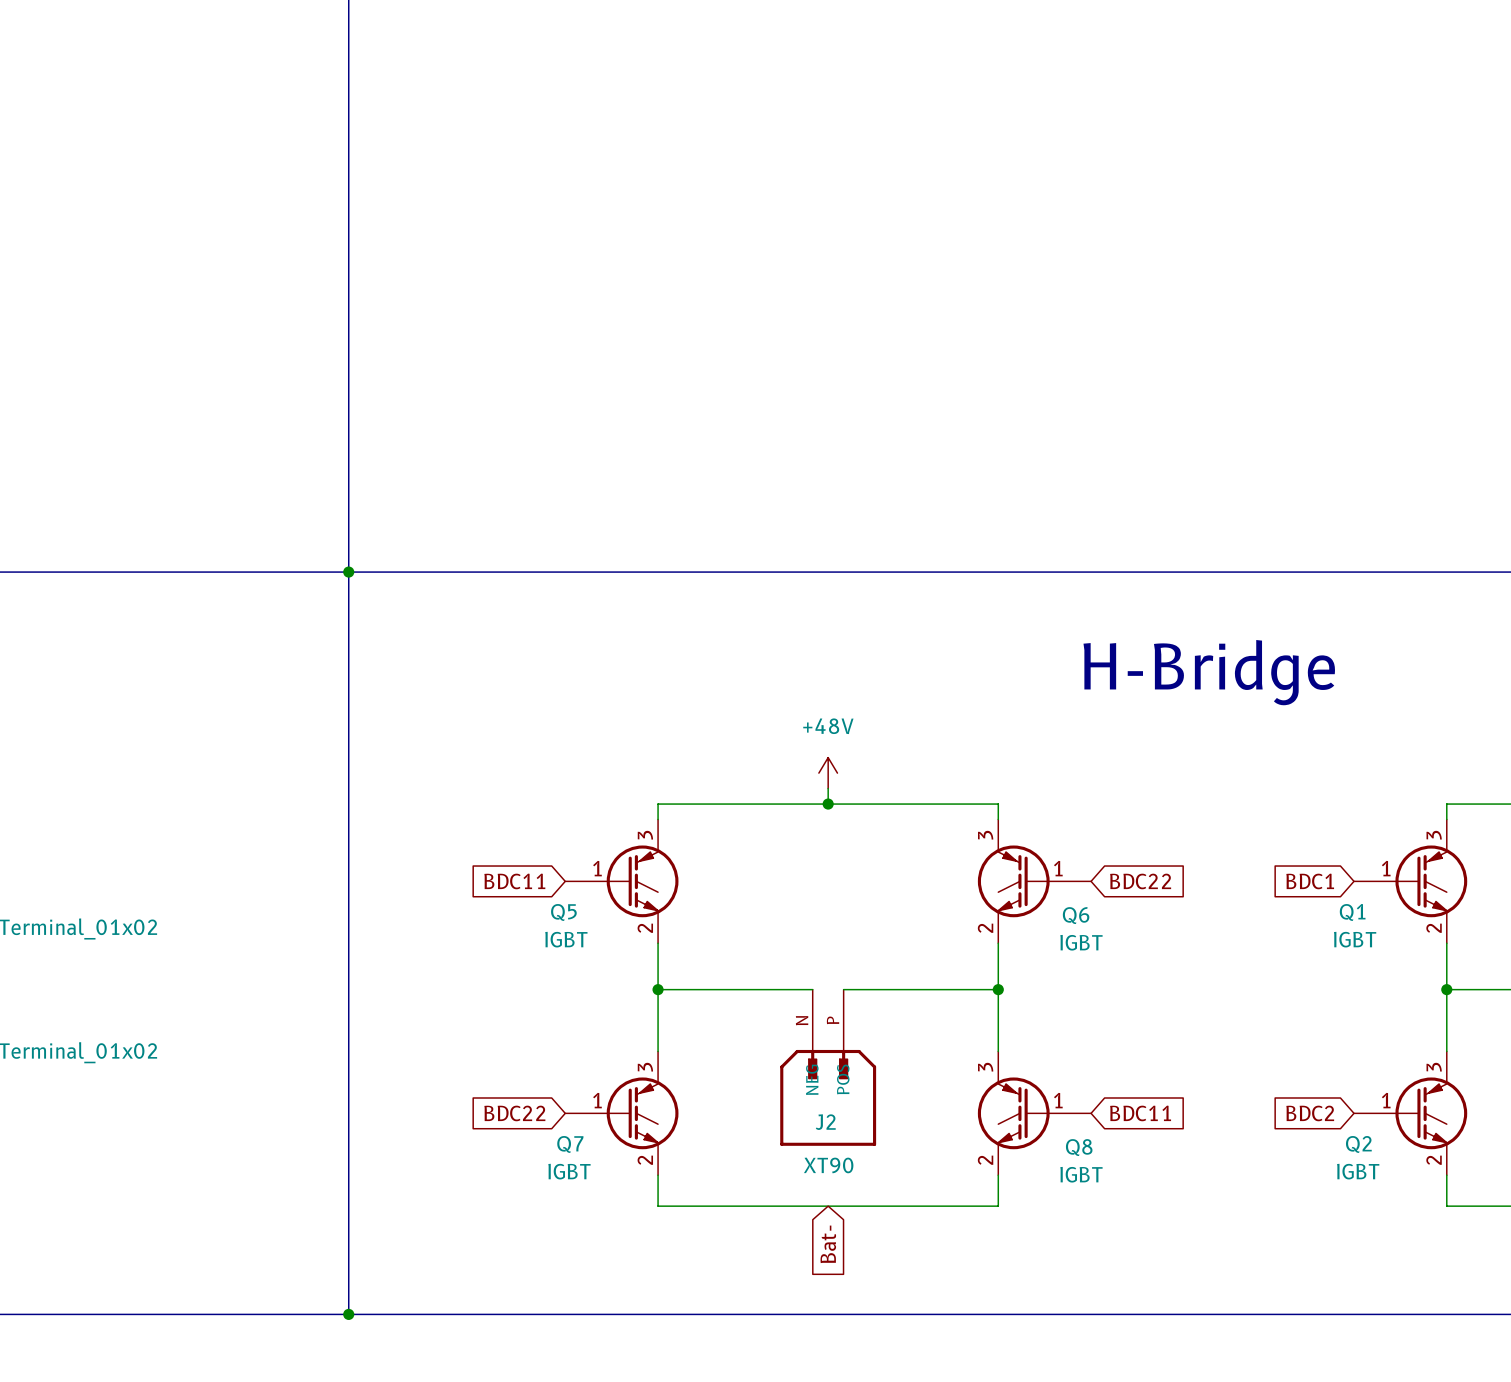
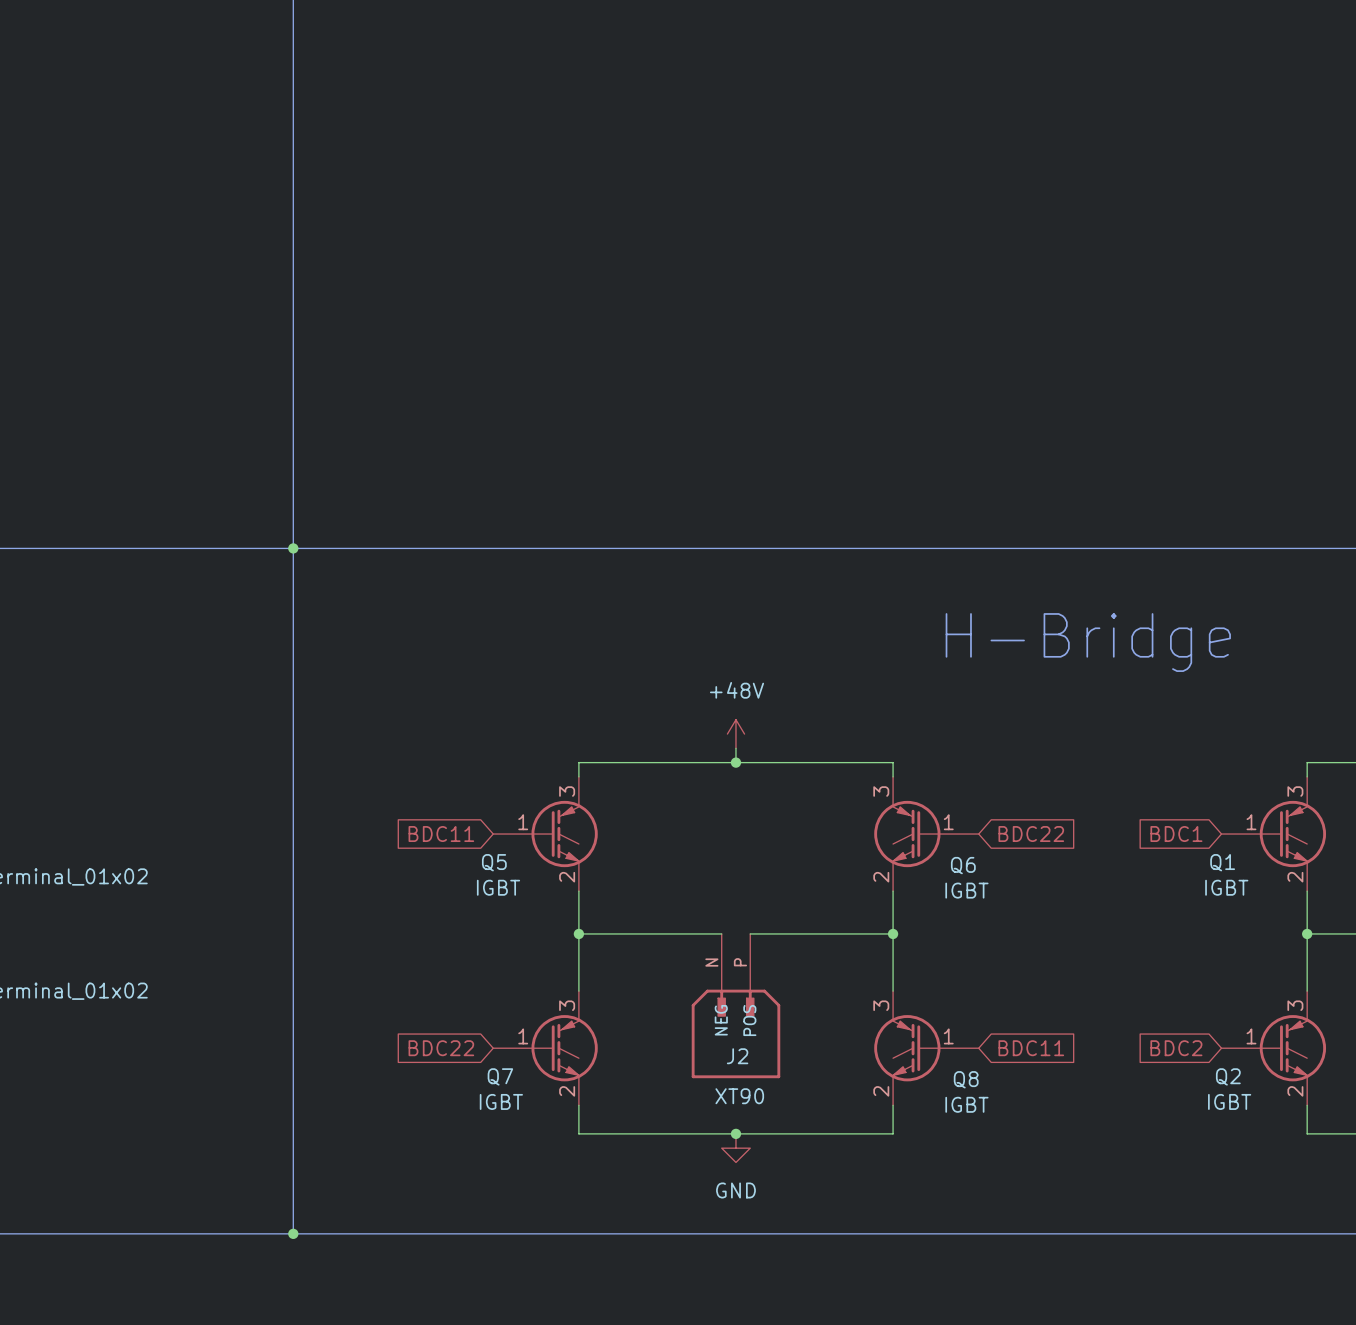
junction: none -> (735, 1133)
power symbol: none -> GND (735, 1148)
global label: Bat- (828, 1244) -> none

